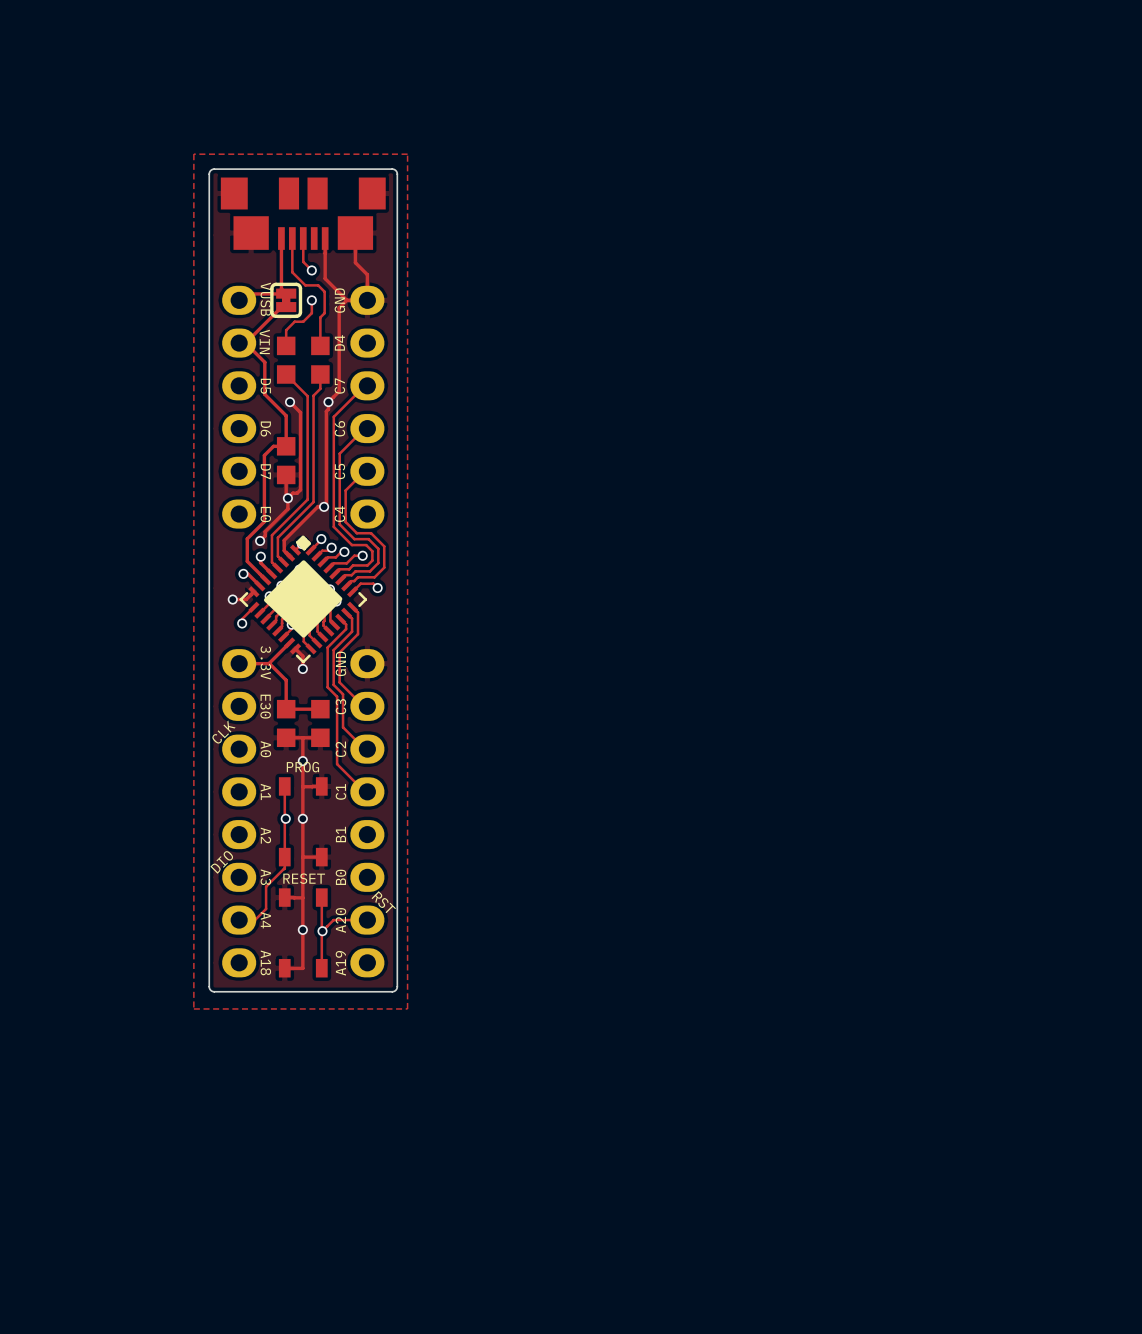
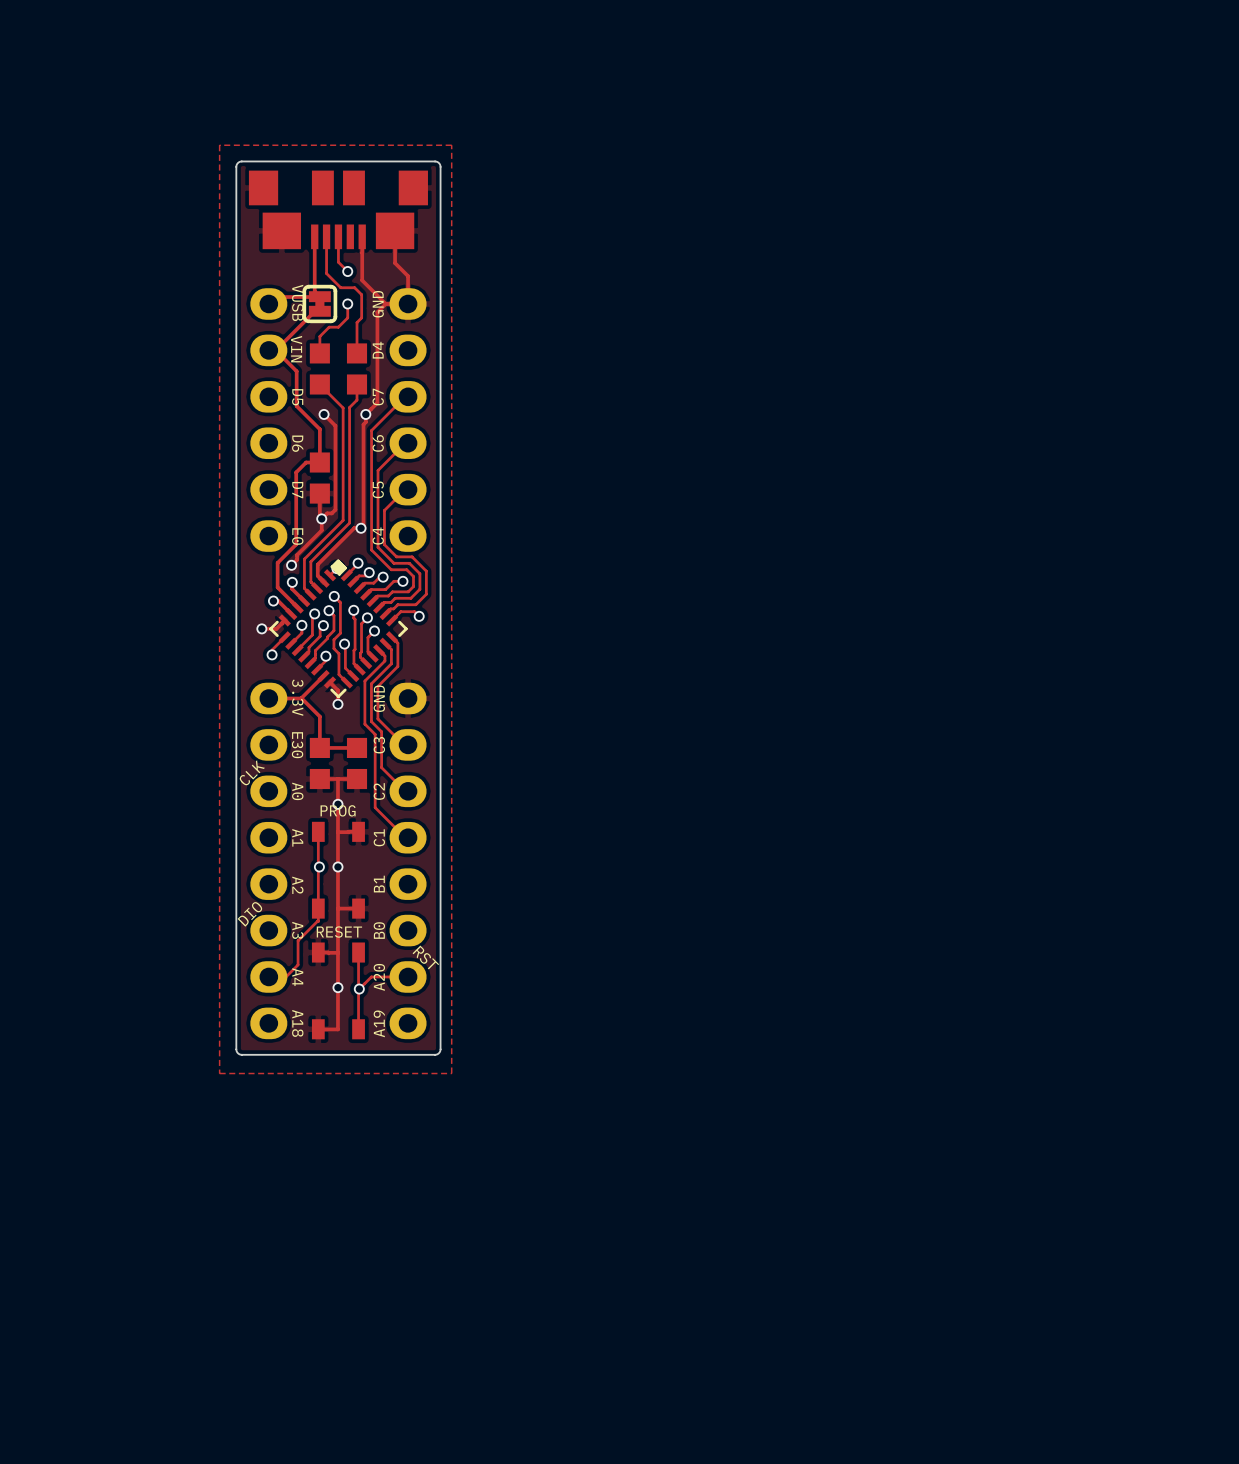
drawing: [263, 560, 343, 638] -> none

